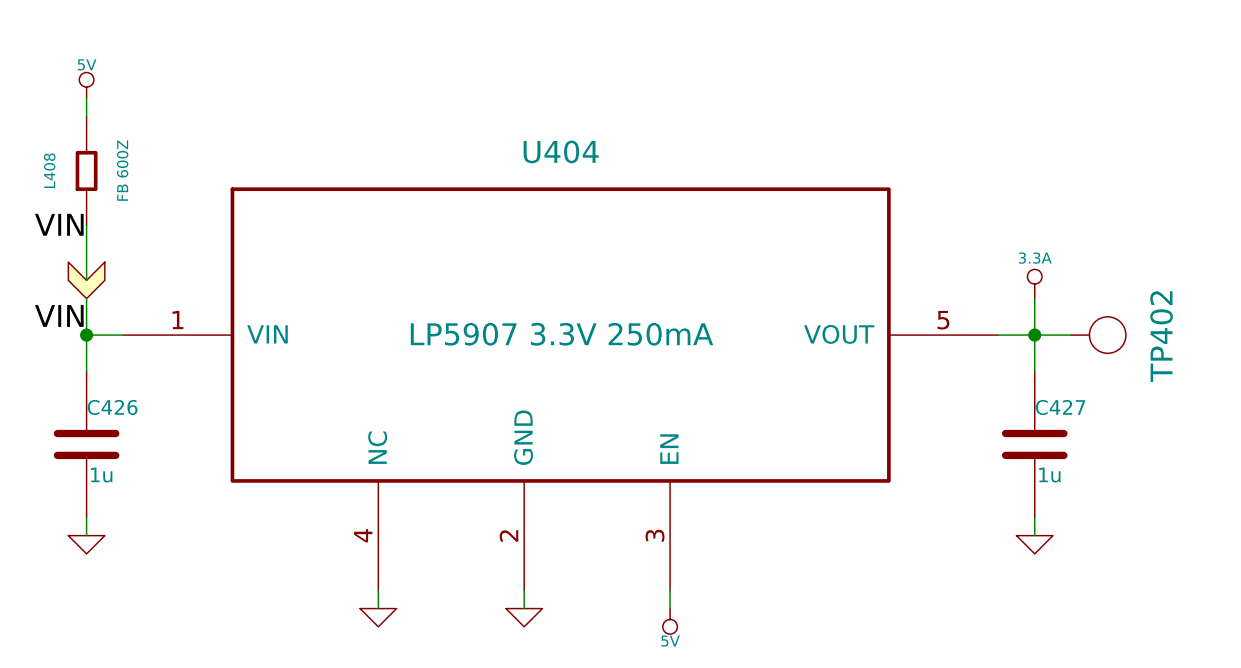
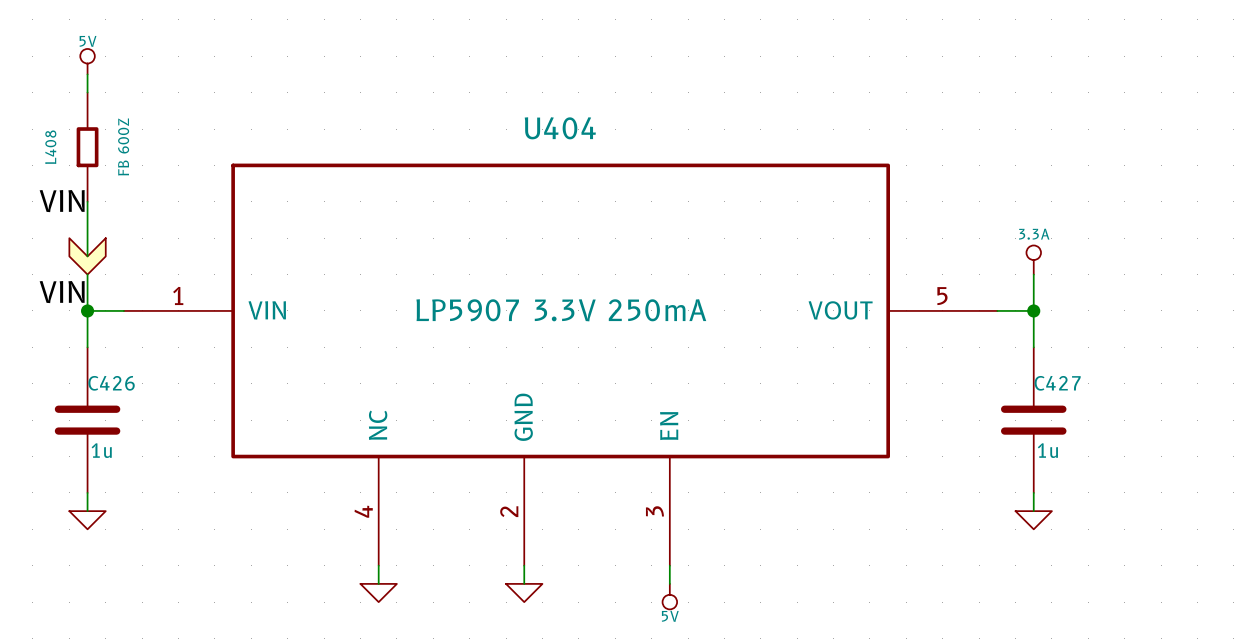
wire: (1034, 335) (1071, 335) -> none
TP402: (1098, 335) -> none

